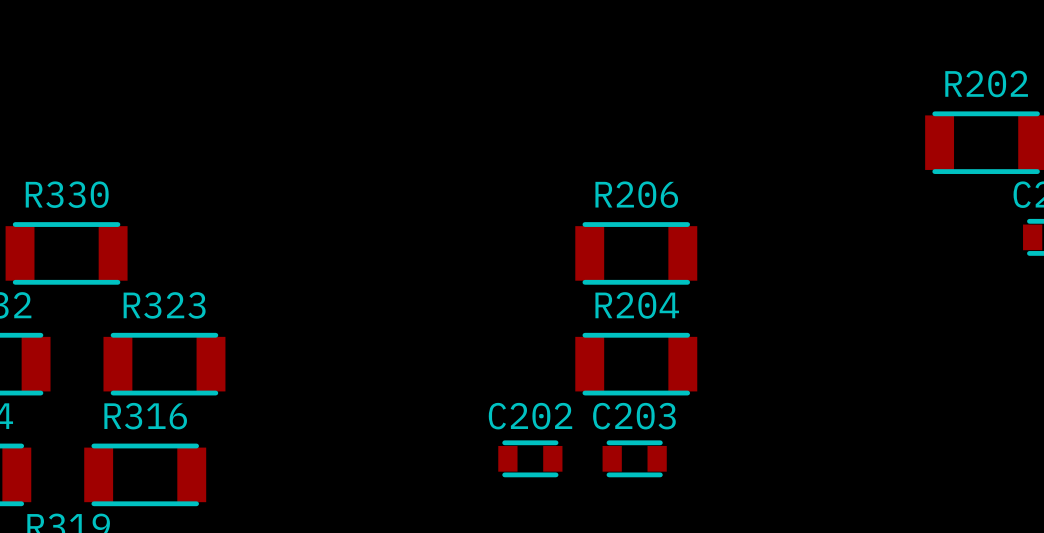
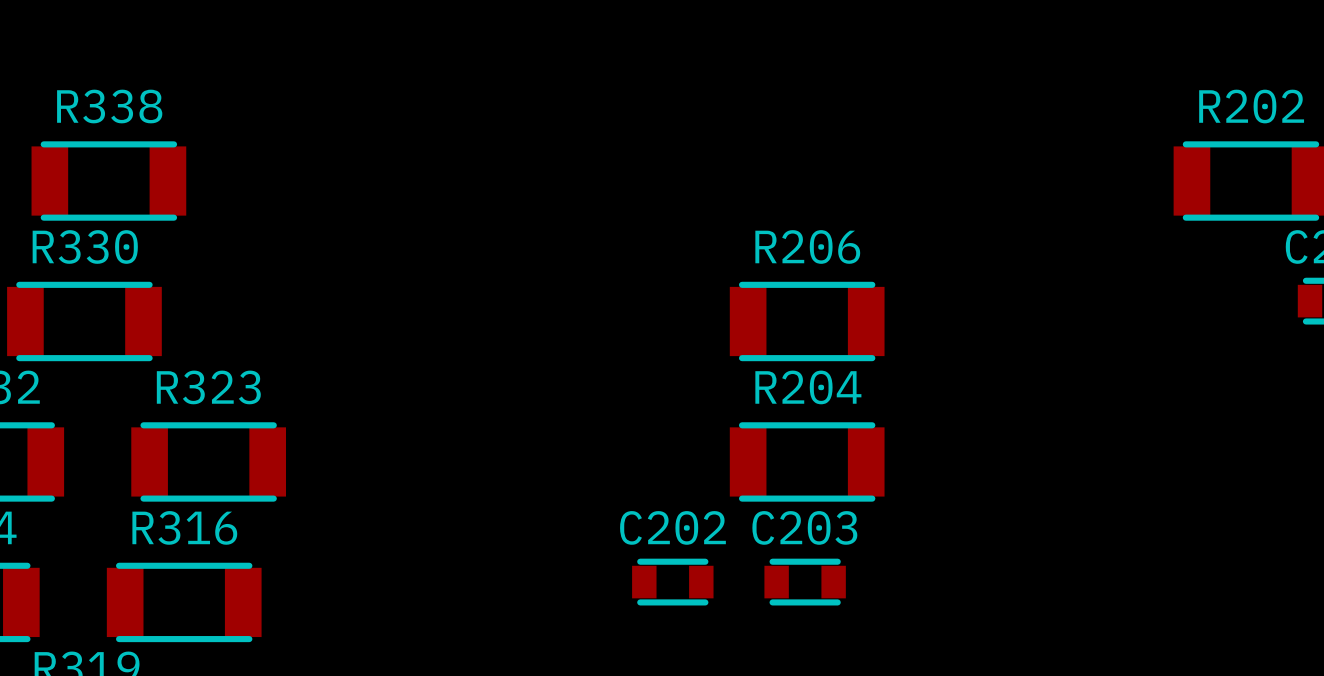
R338: none -> (108, 181)

